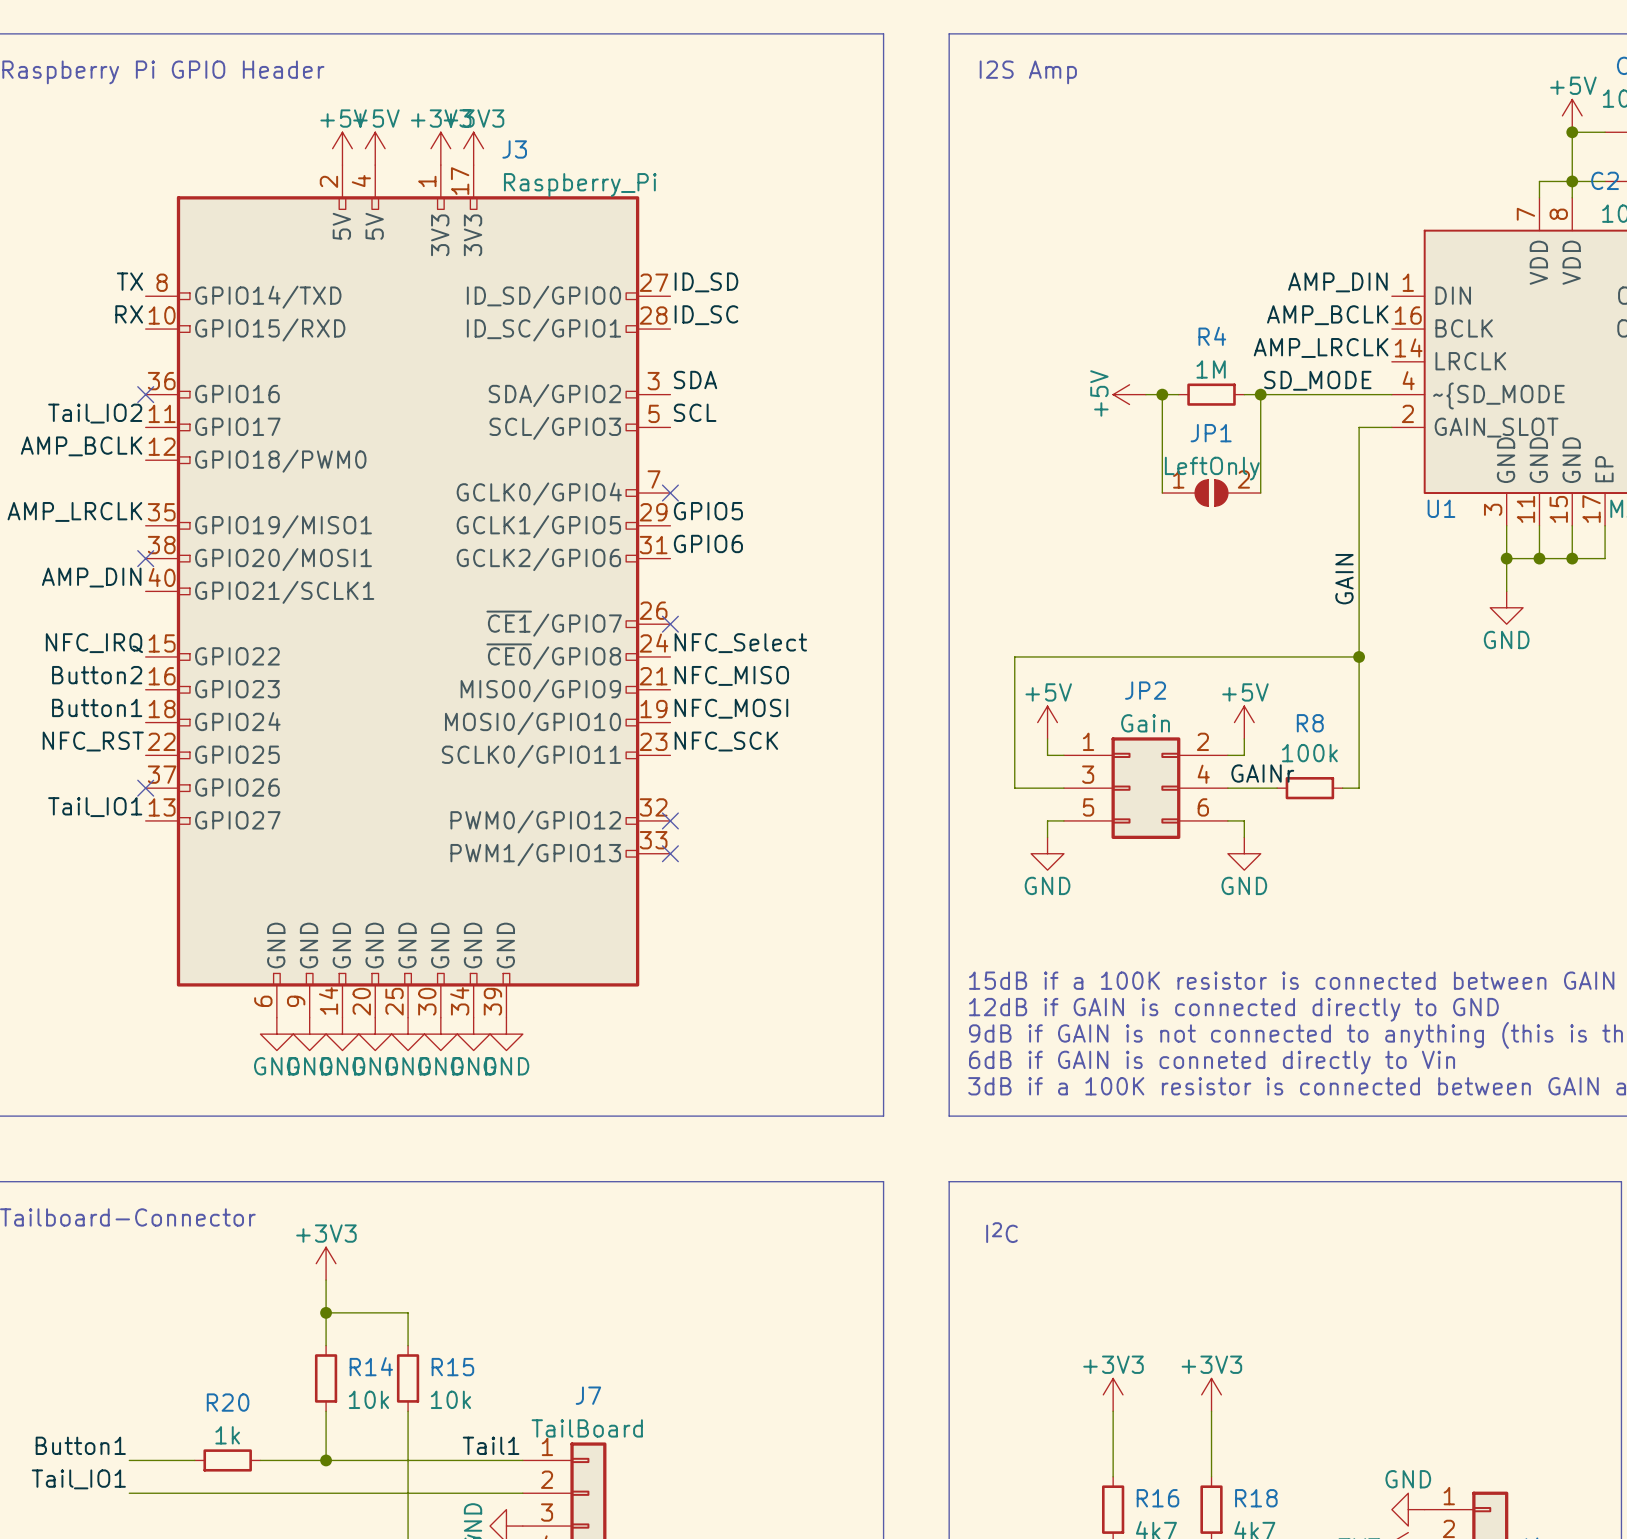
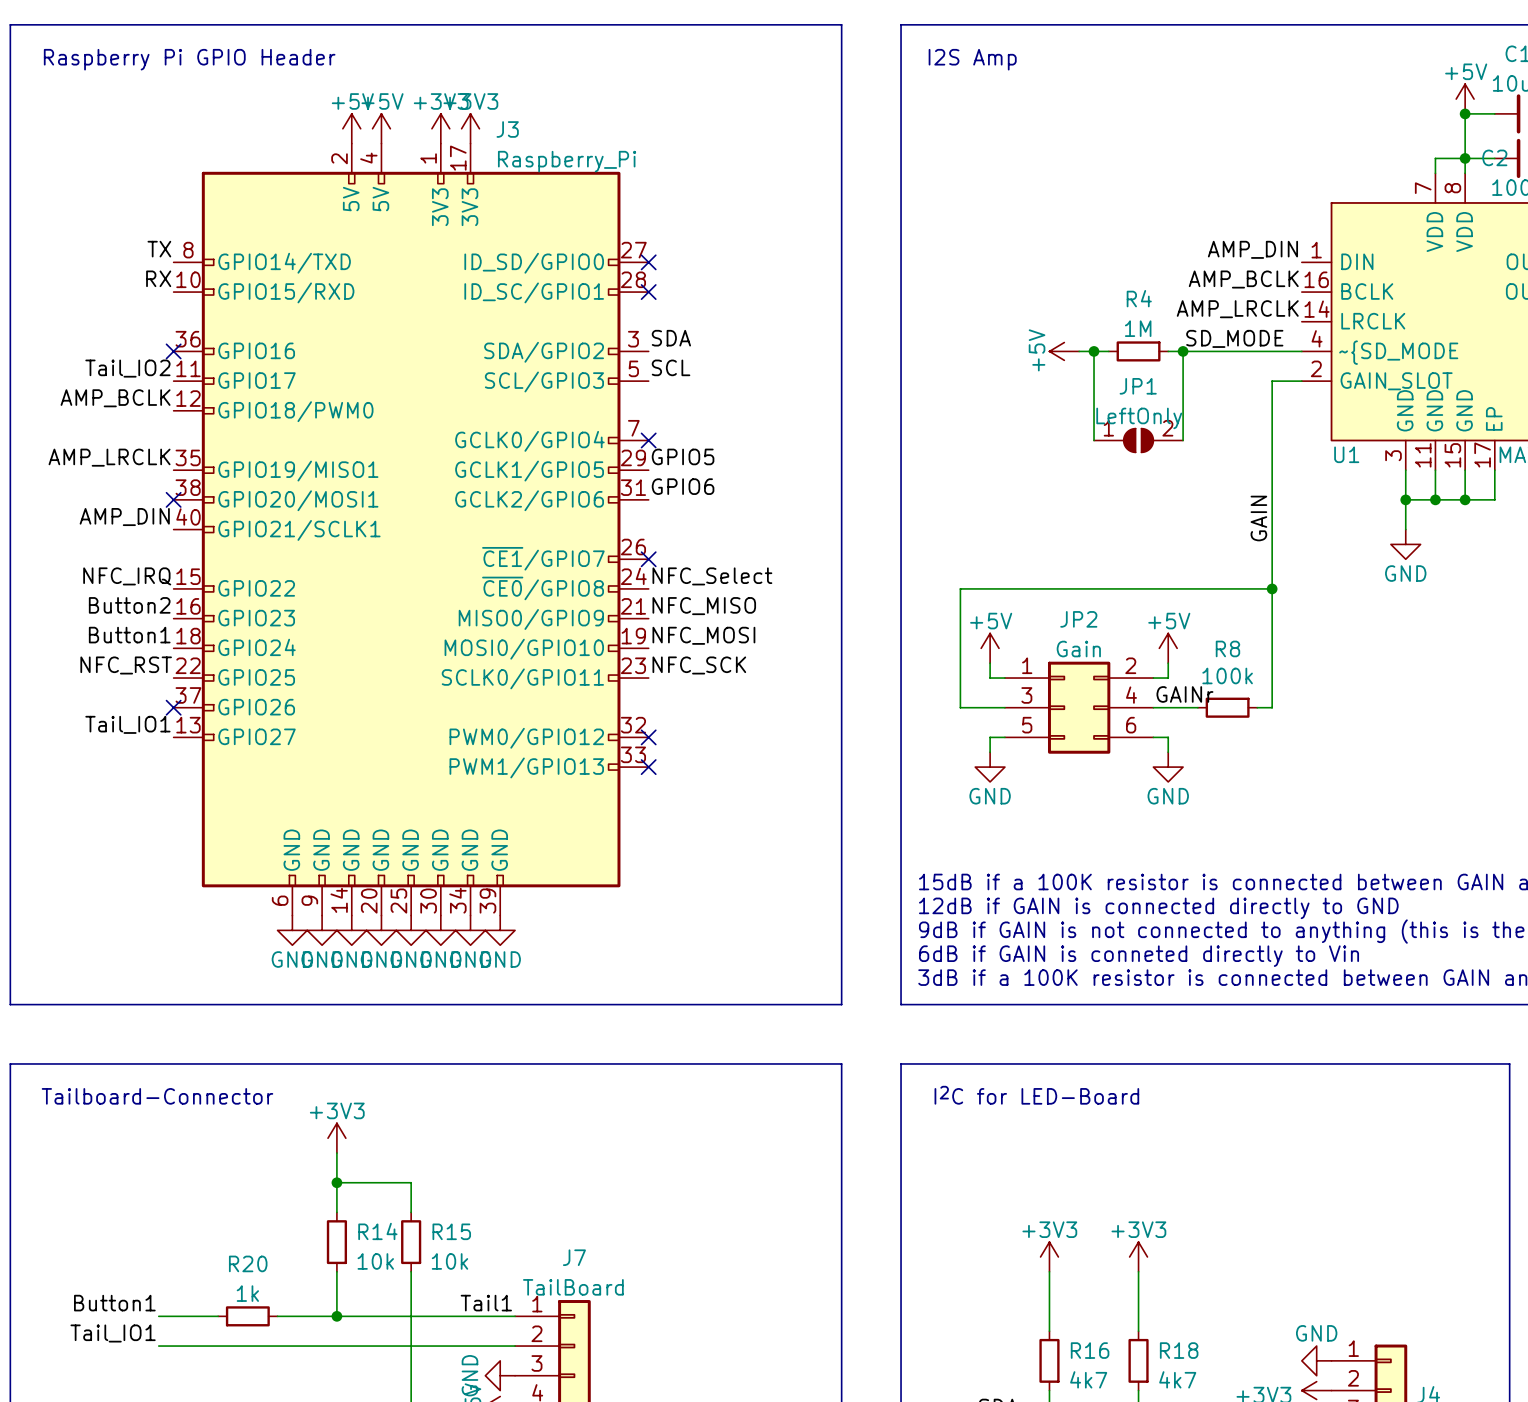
label: ID_SD (706, 282) -> none
no-connect mark: none -> (648, 262)
label: ID_SC (706, 315) -> none
no-connect mark: none -> (648, 292)
text: none -> I2C for LED-Board (1036, 1095)
text: I2C (1001, 1232) -> none

